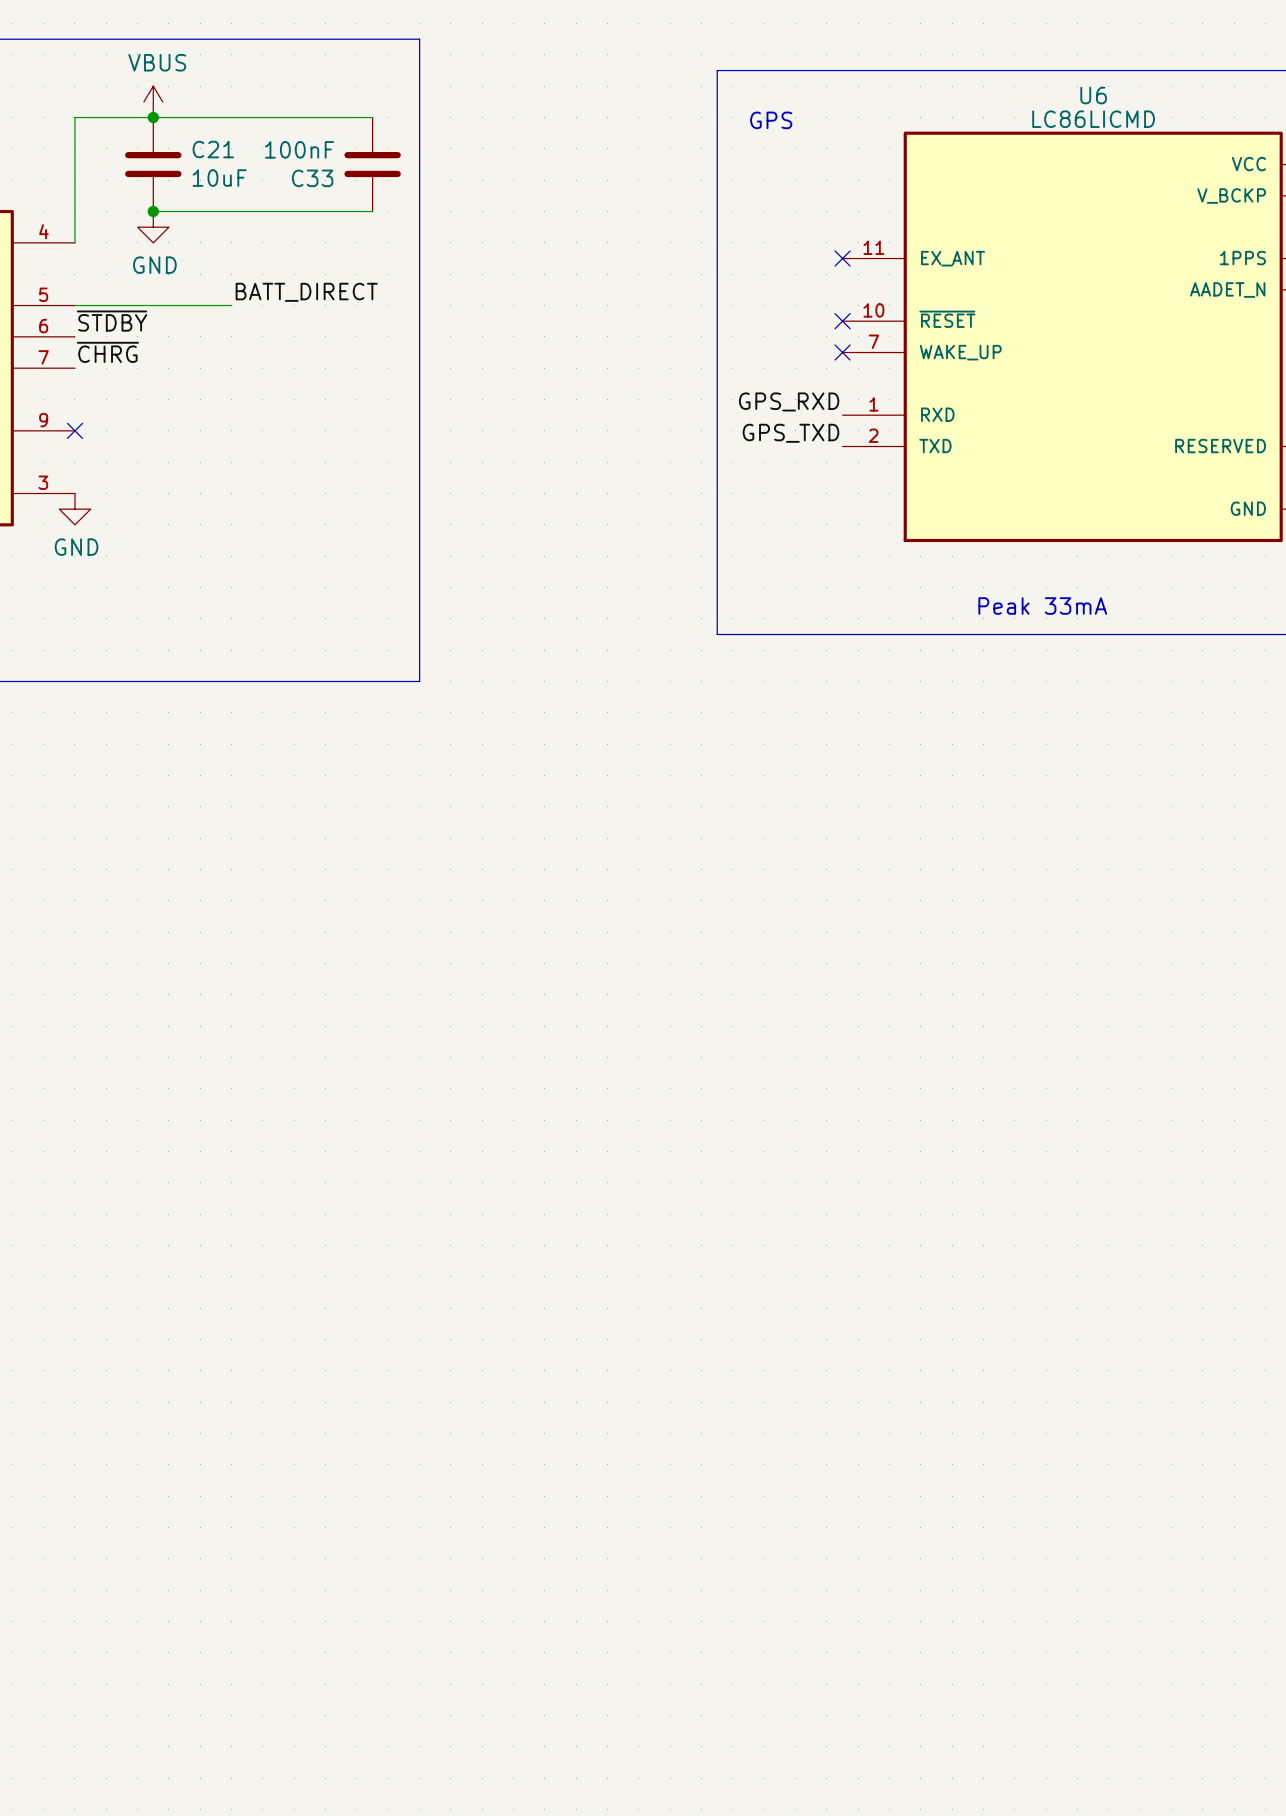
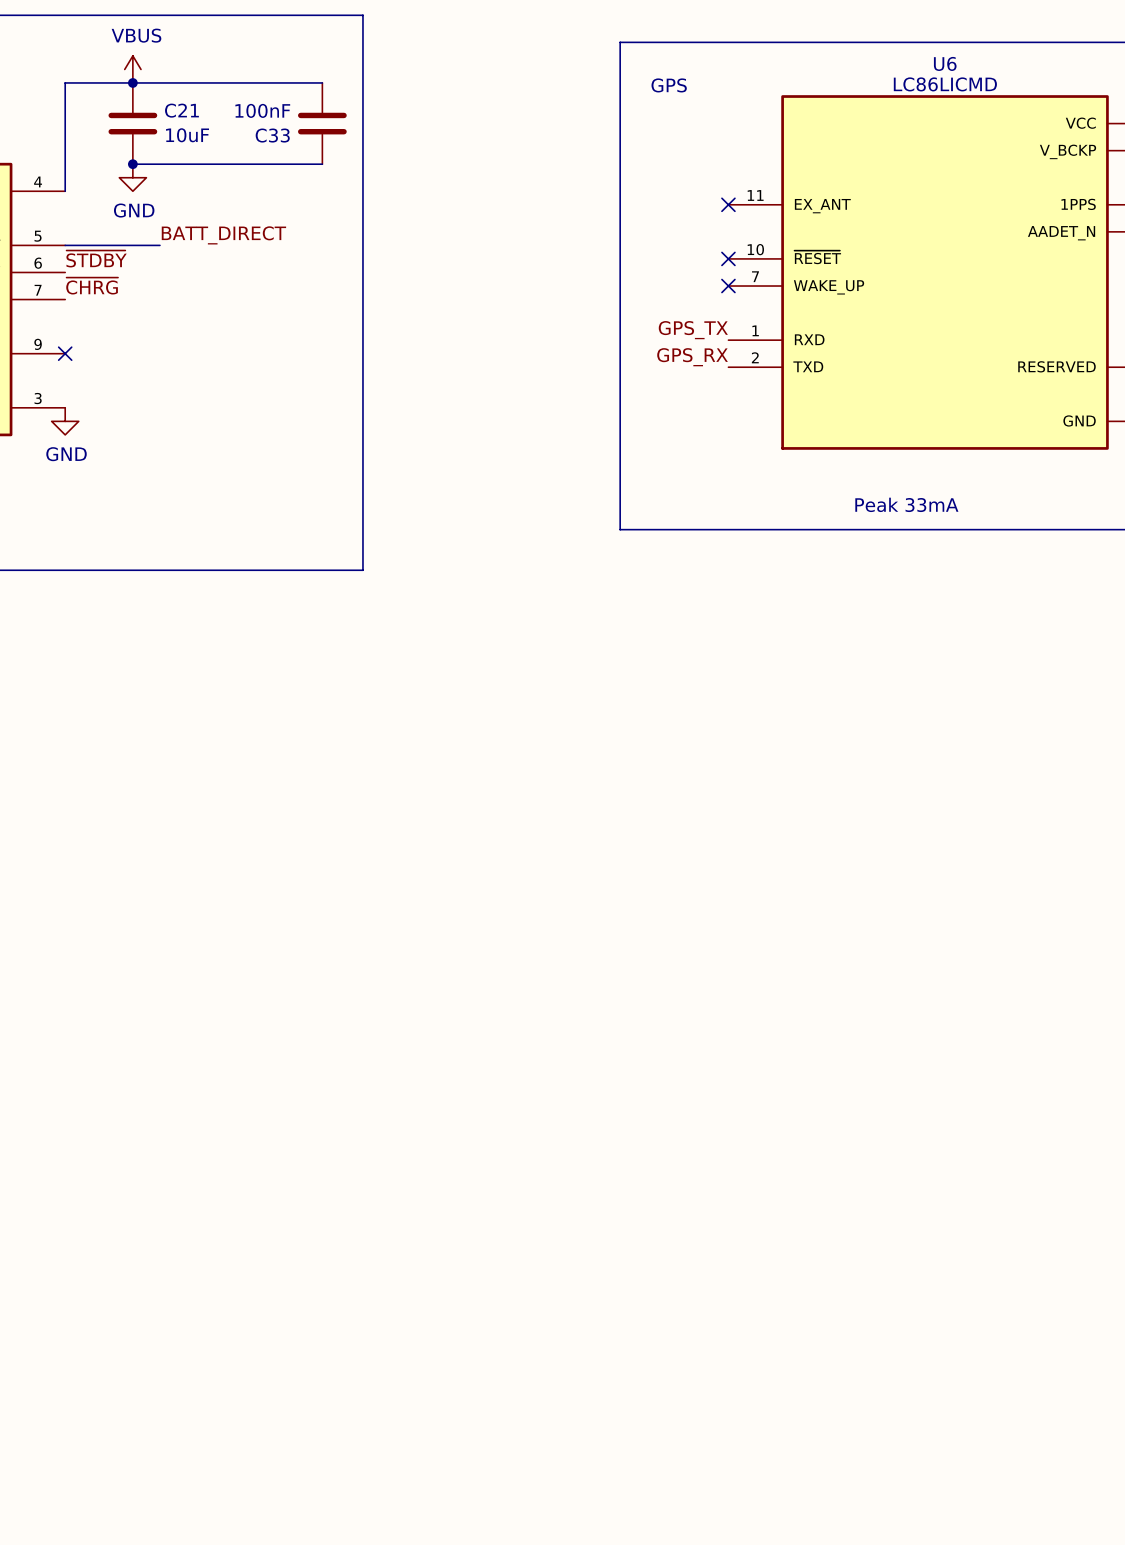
label position: BATT_DIRECT (306, 292) -> BATT_DIRECT (223, 235)
wire: (184, 305) (231, 305) -> none
label: GPS_RXD (789, 401) -> GPS_TX (693, 330)
label: GPS_TXD (790, 433) -> GPS_RX (692, 357)

